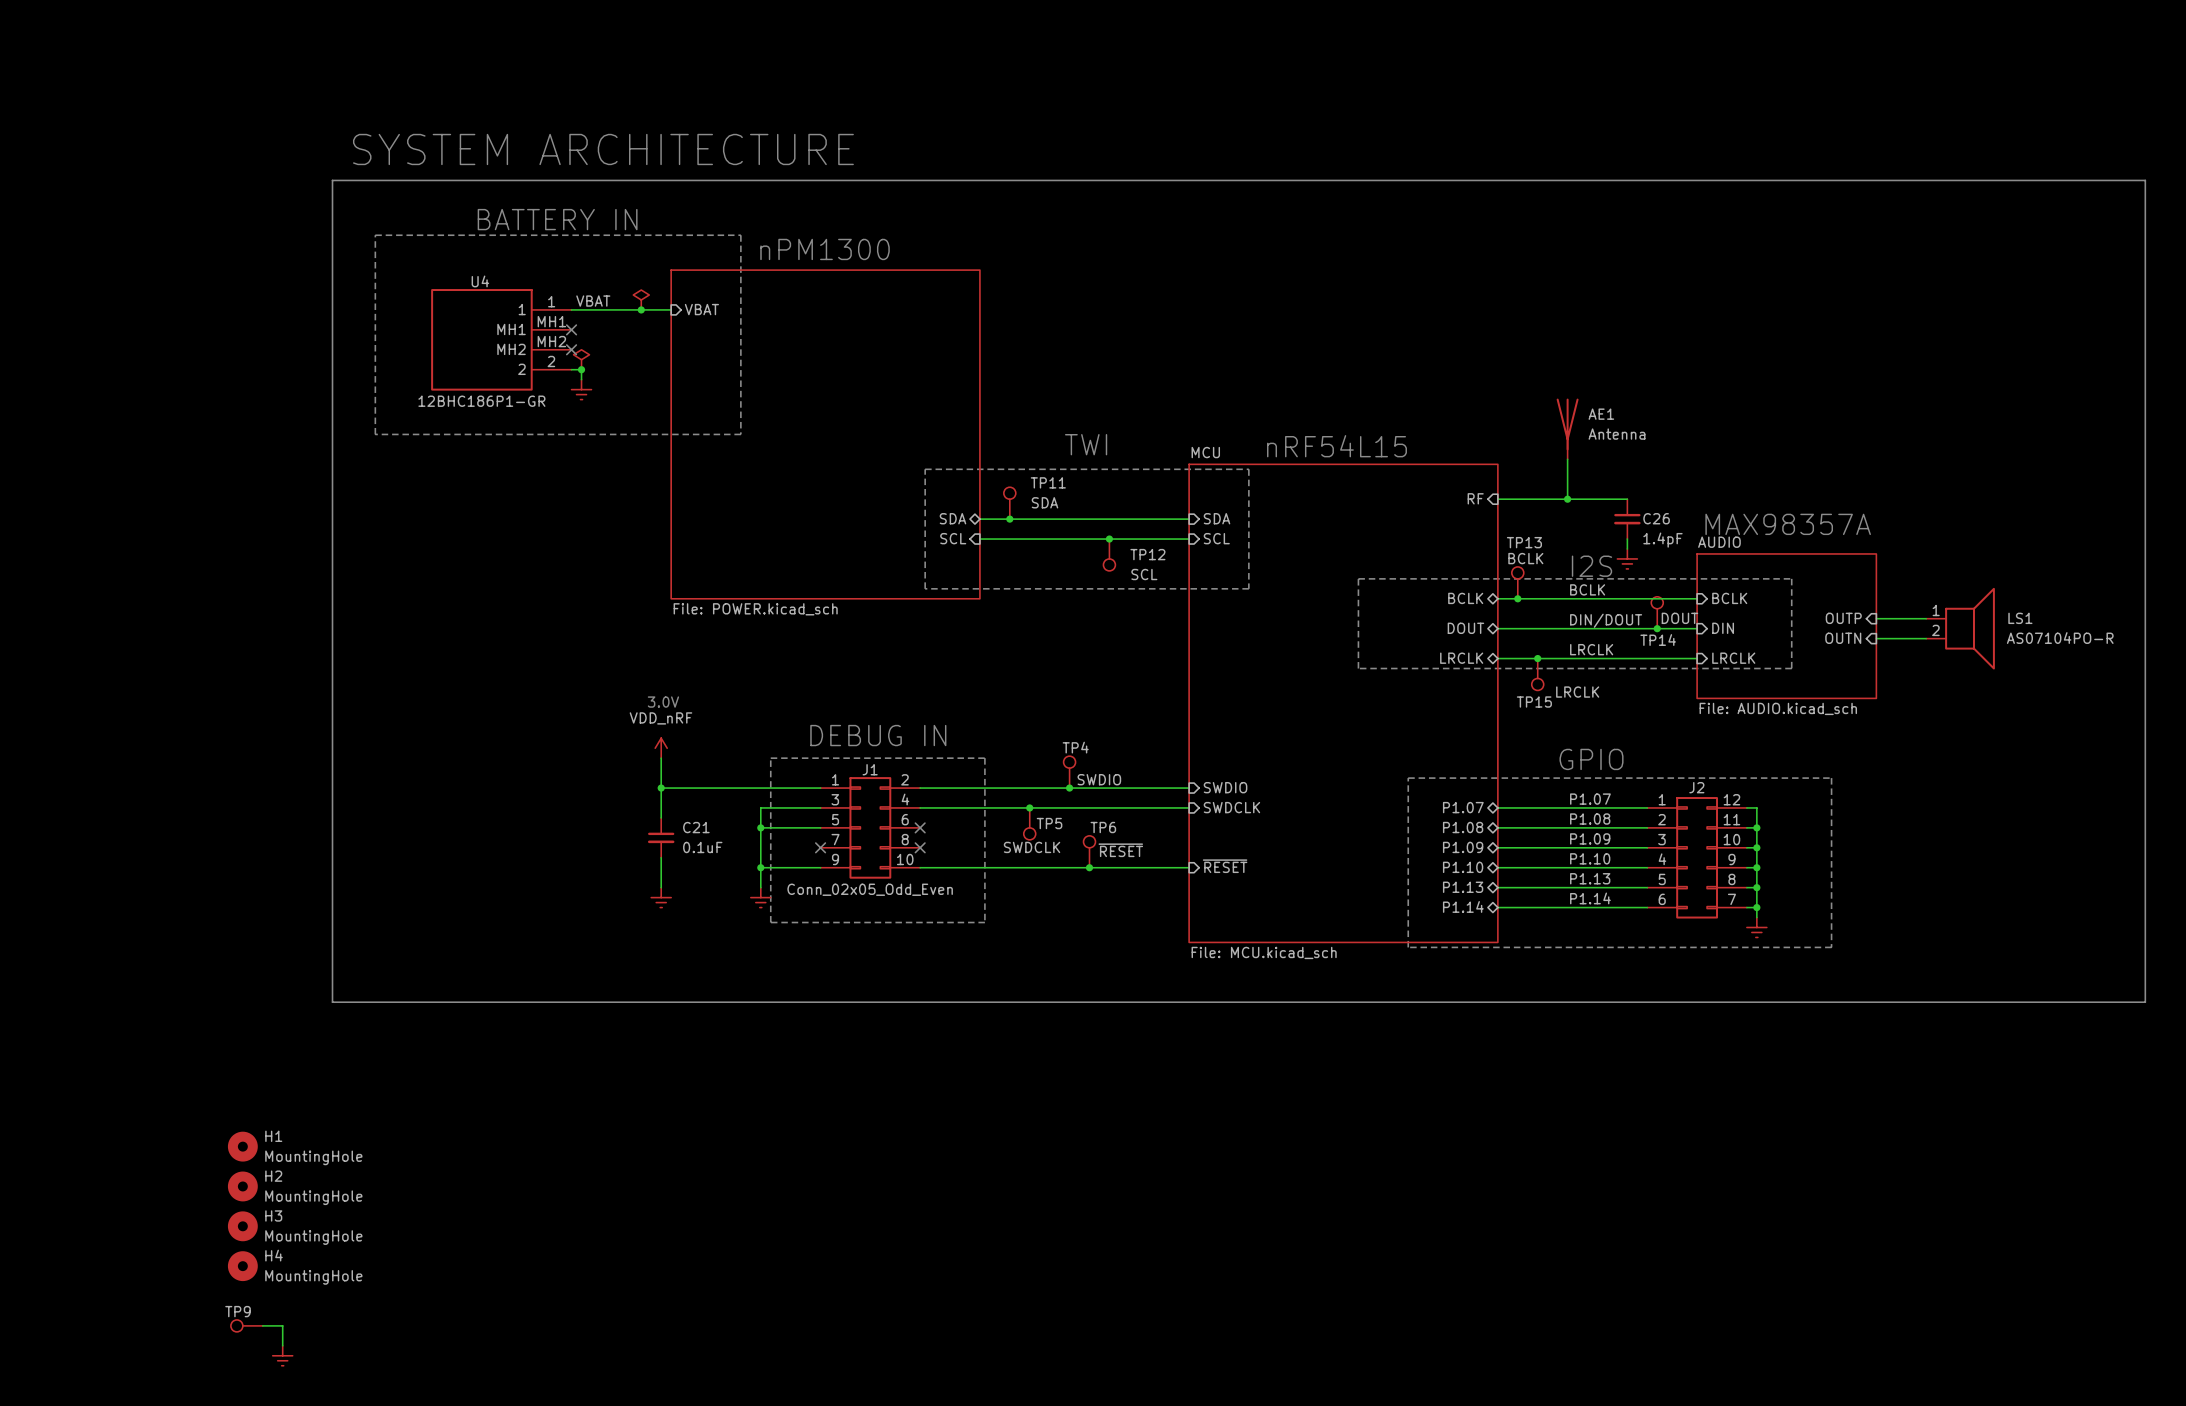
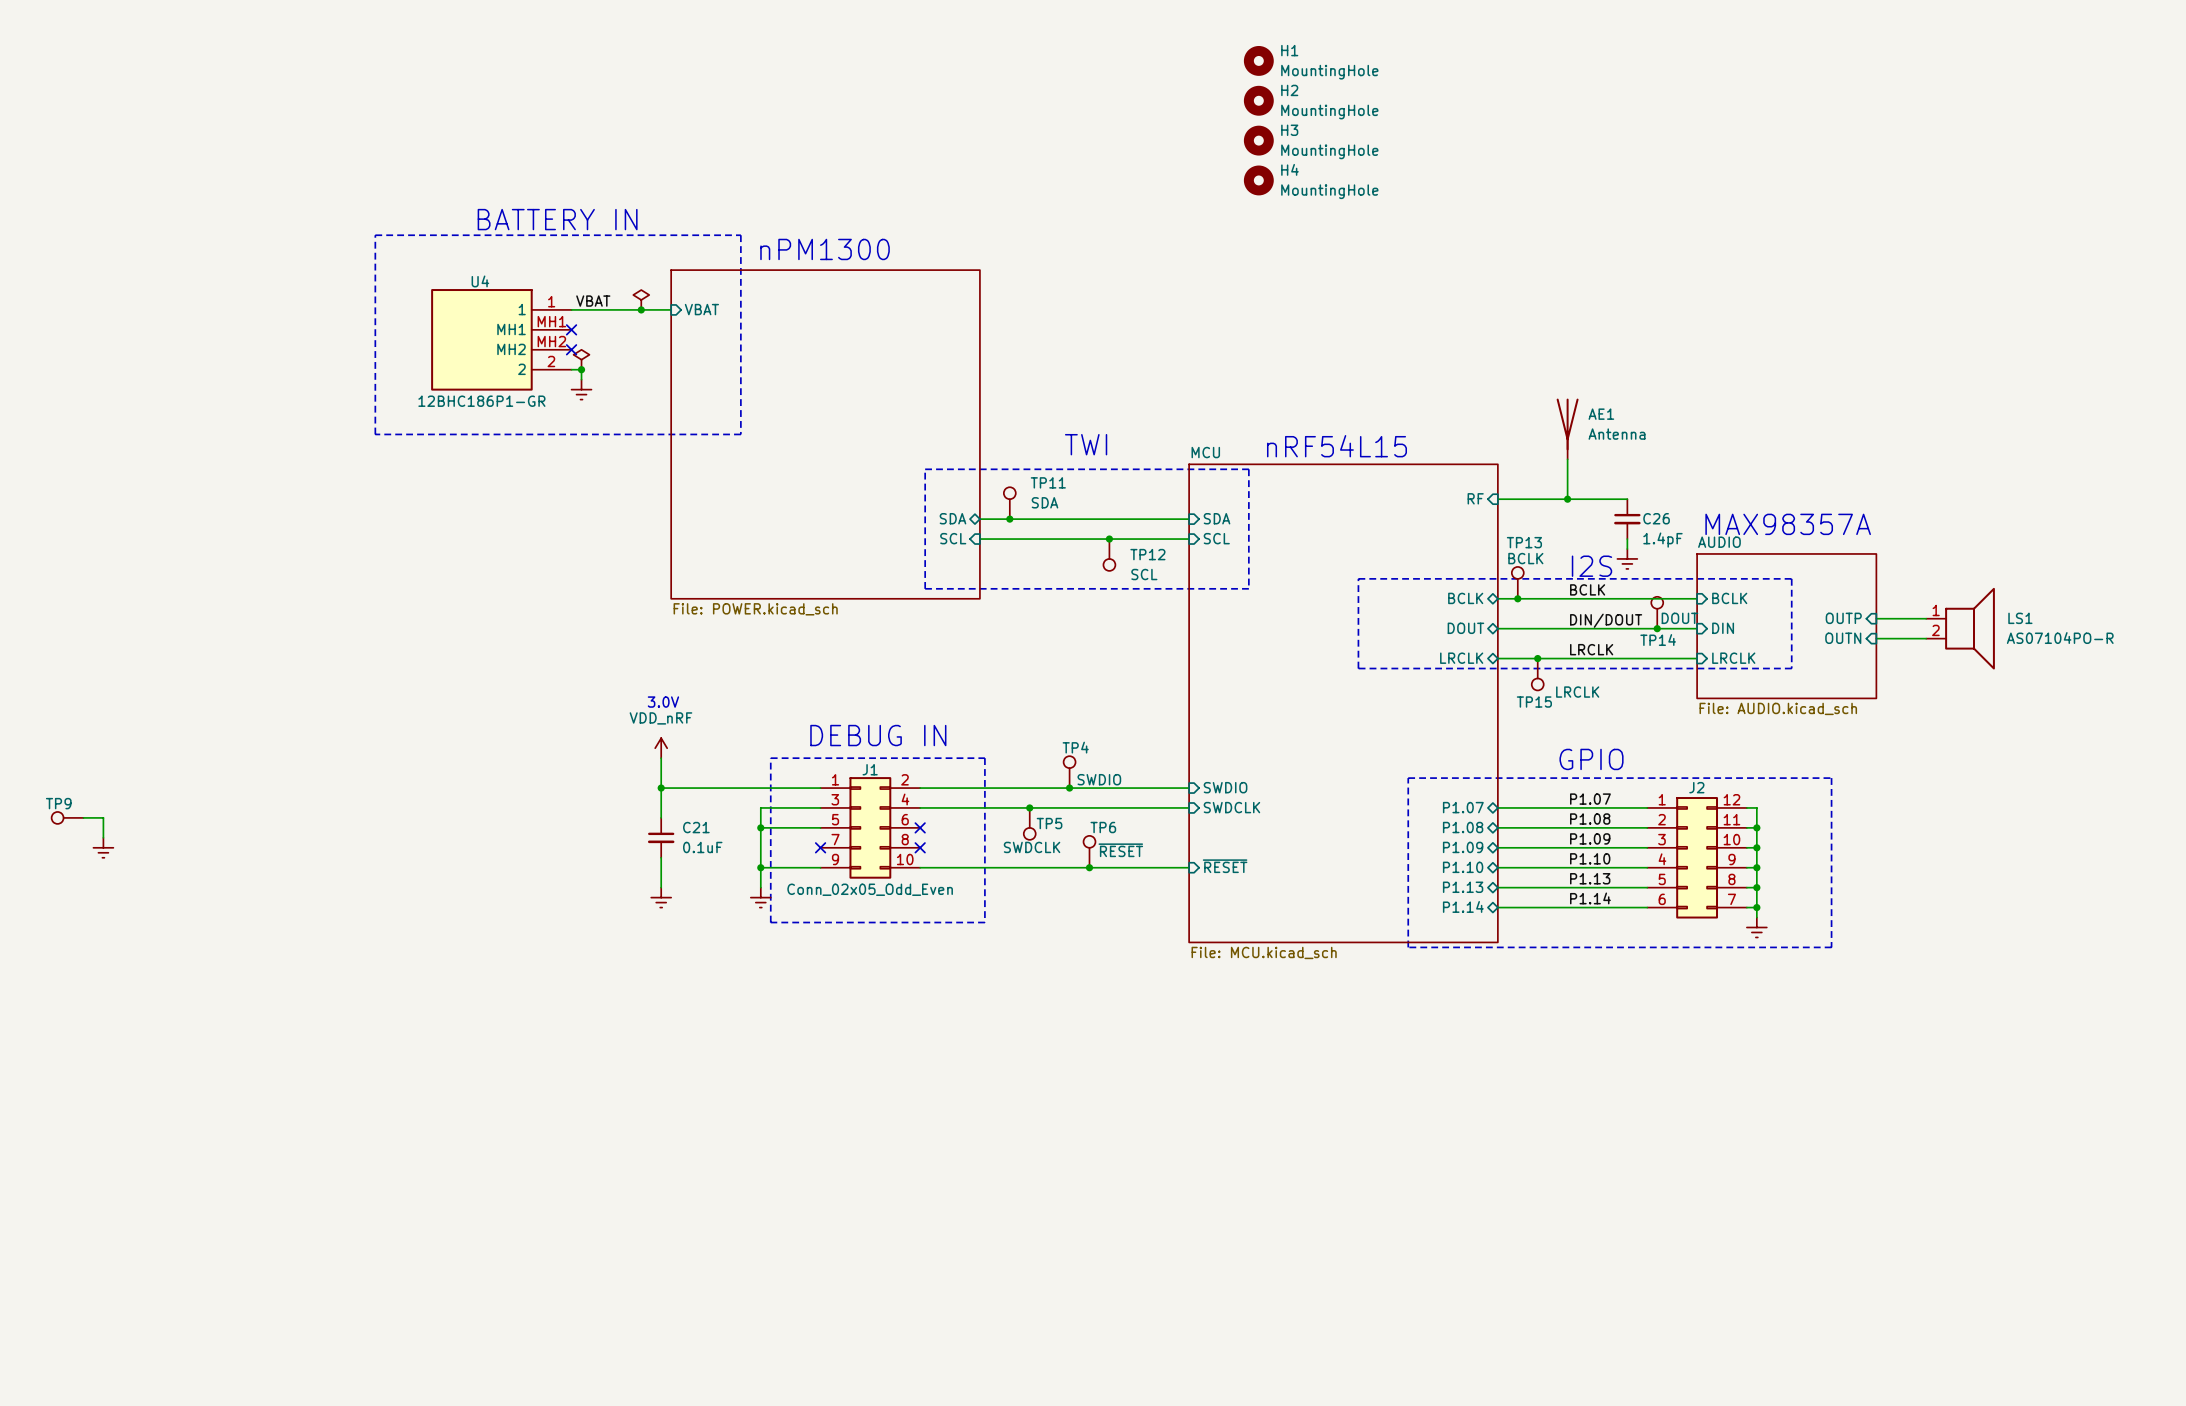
text: SYSTEM ARCHITECTURE (603, 149) -> none
line: (332, 180) (2145, 180) (2145, 1002) (332, 1002) (332, 180) -> none
wire: none -> (83, 817) (103, 817) (103, 837)
power symbol: none -> (103, 847)
H1 position: (242, 1146) -> (1258, 60)
H2 position: (242, 1186) -> (1258, 100)
H3 position: (242, 1226) -> (1258, 140)
H4 position: (242, 1266) -> (1258, 180)
TP9 position: (246, 1325) -> (67, 817)
wire: (262, 1325) (282, 1325) (282, 1345) -> none
power symbol: (282, 1355) -> none

